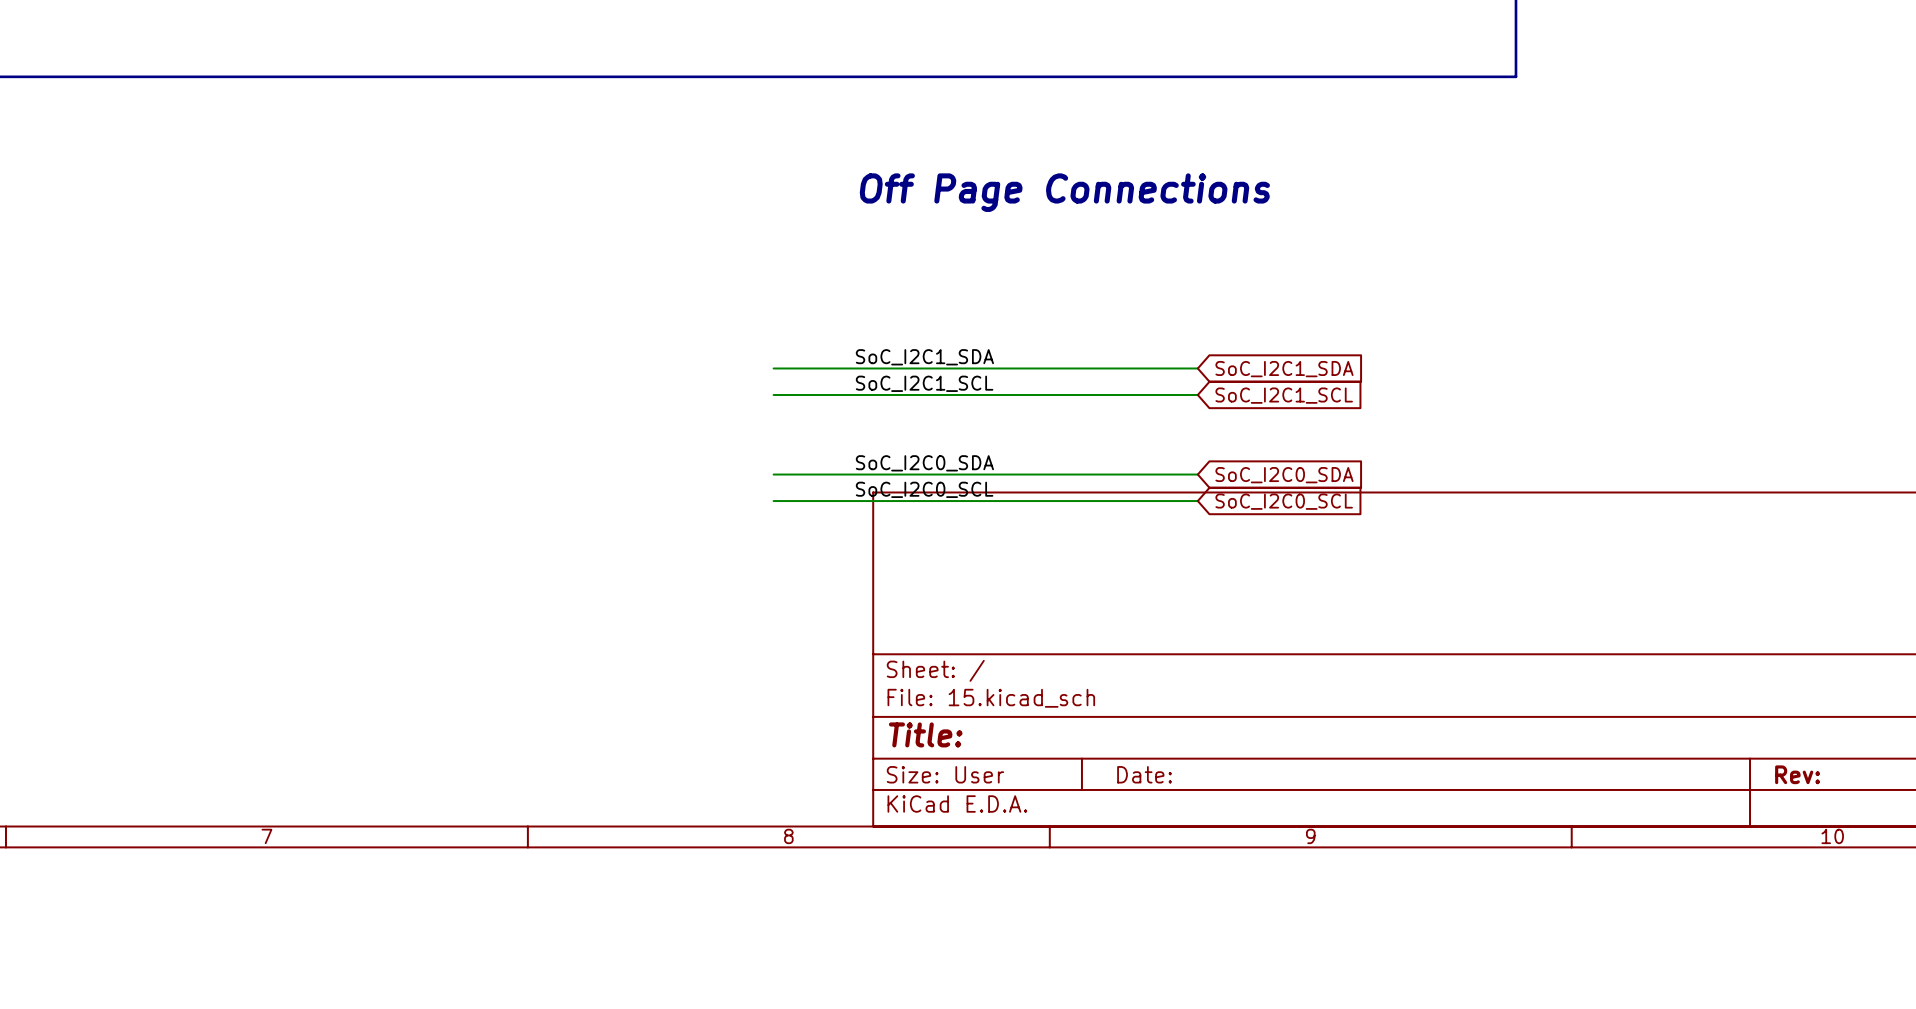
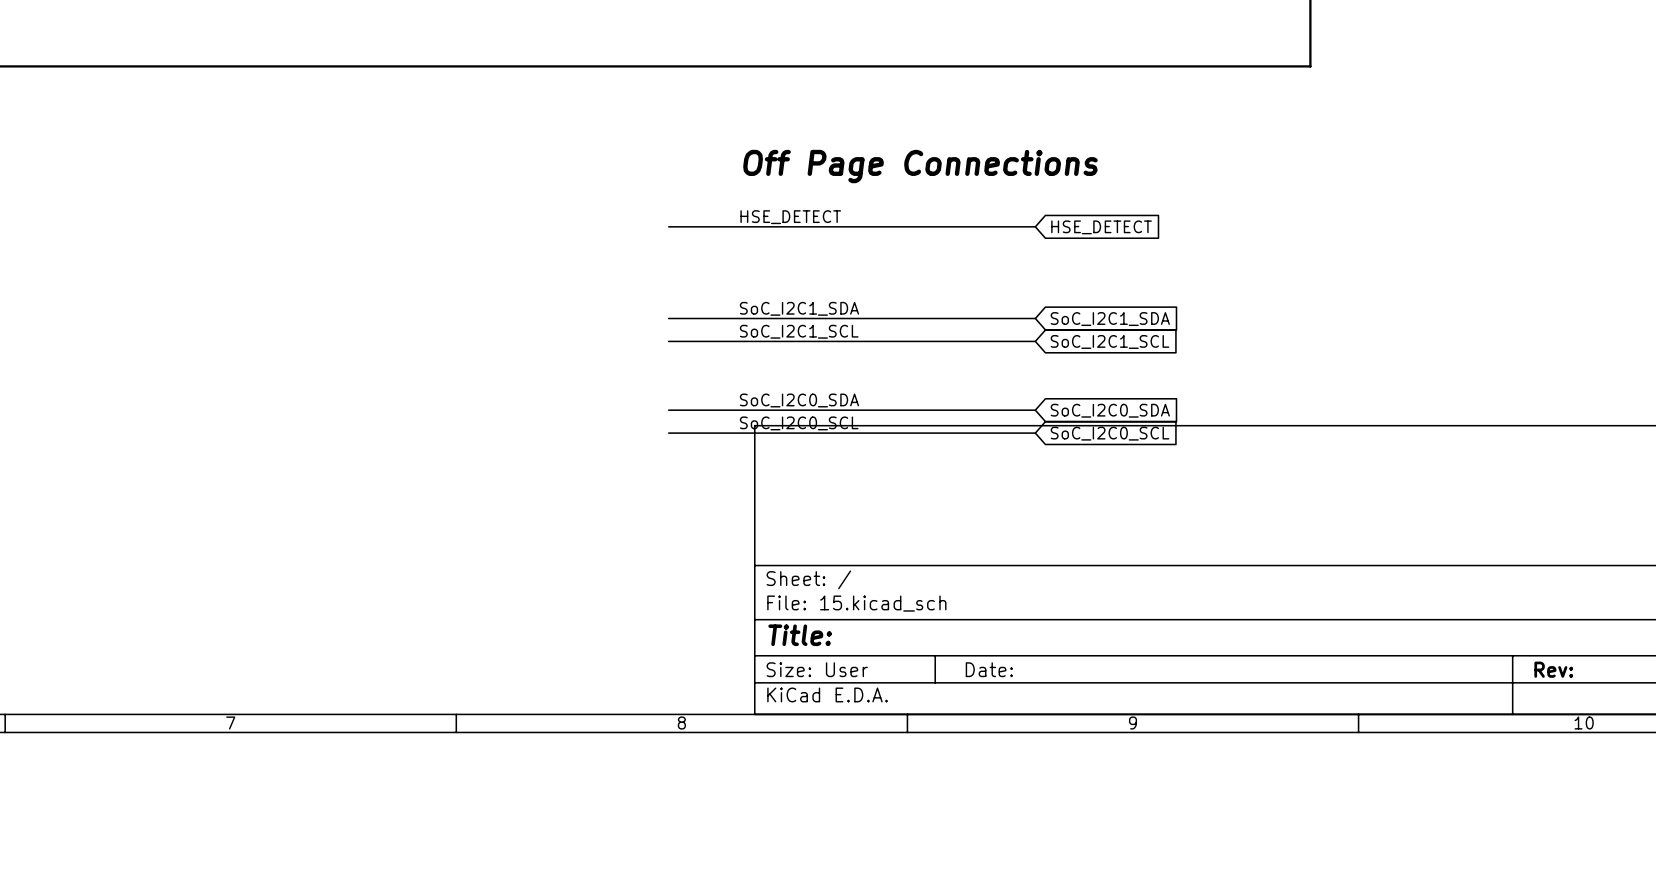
label: none -> HSE_DETECT (790, 217)
wire: none -> (668, 226) (1035, 226)
global label: none -> HSE_DETECT (1101, 227)

